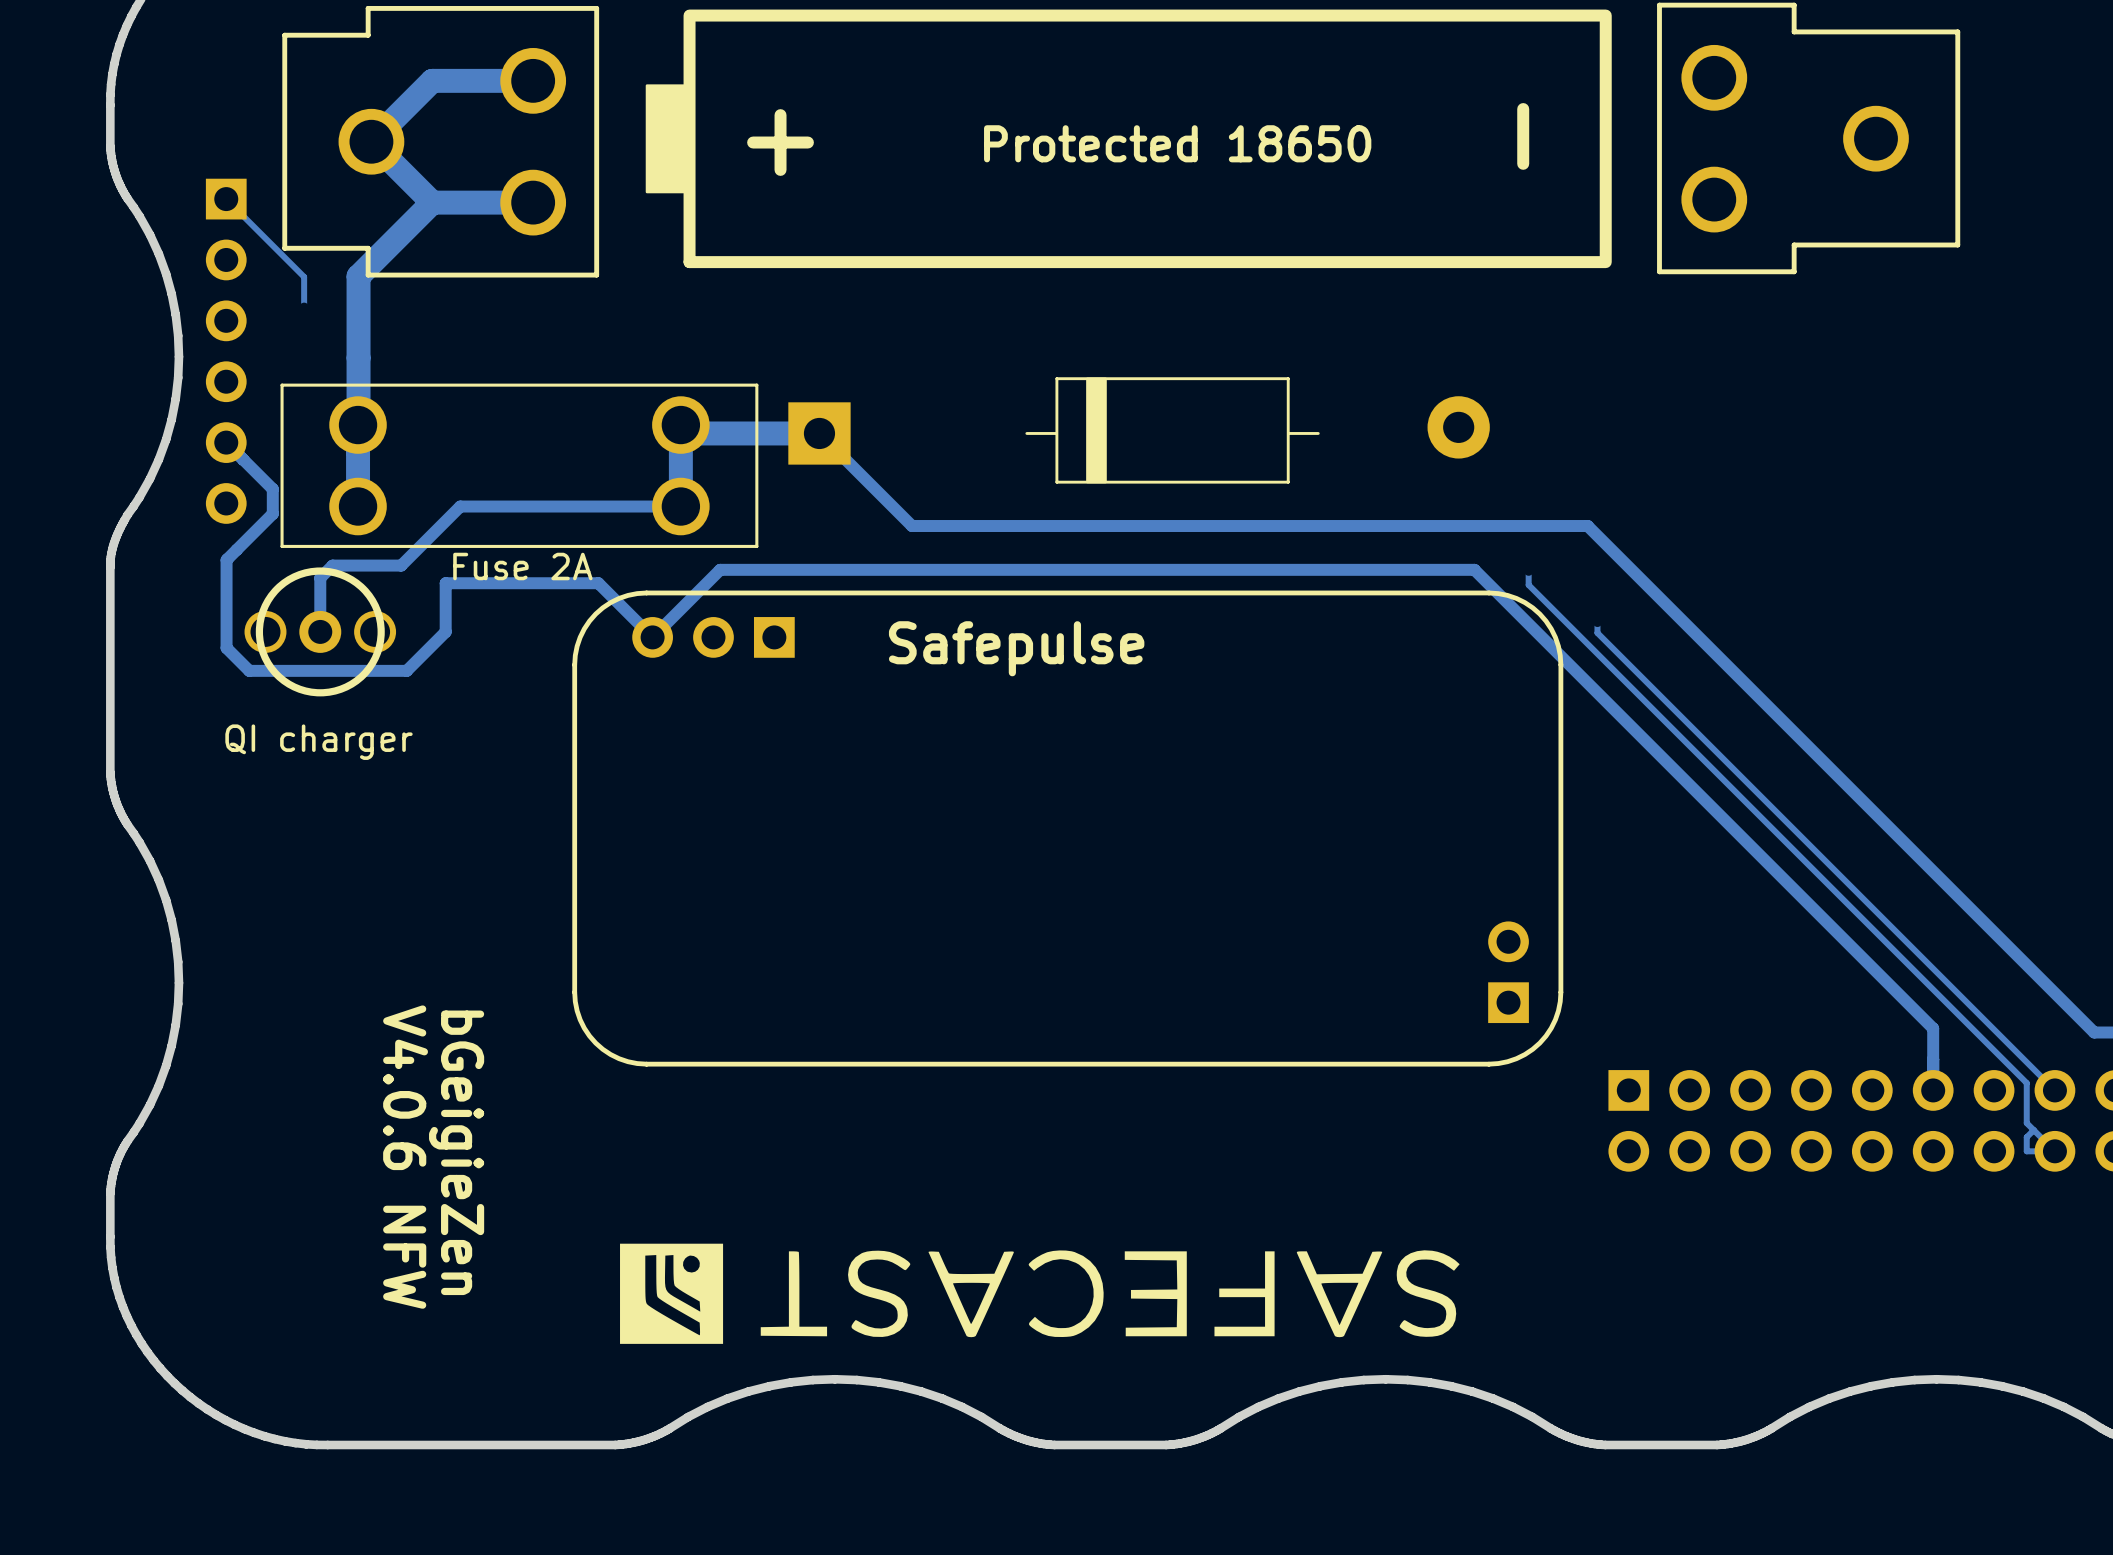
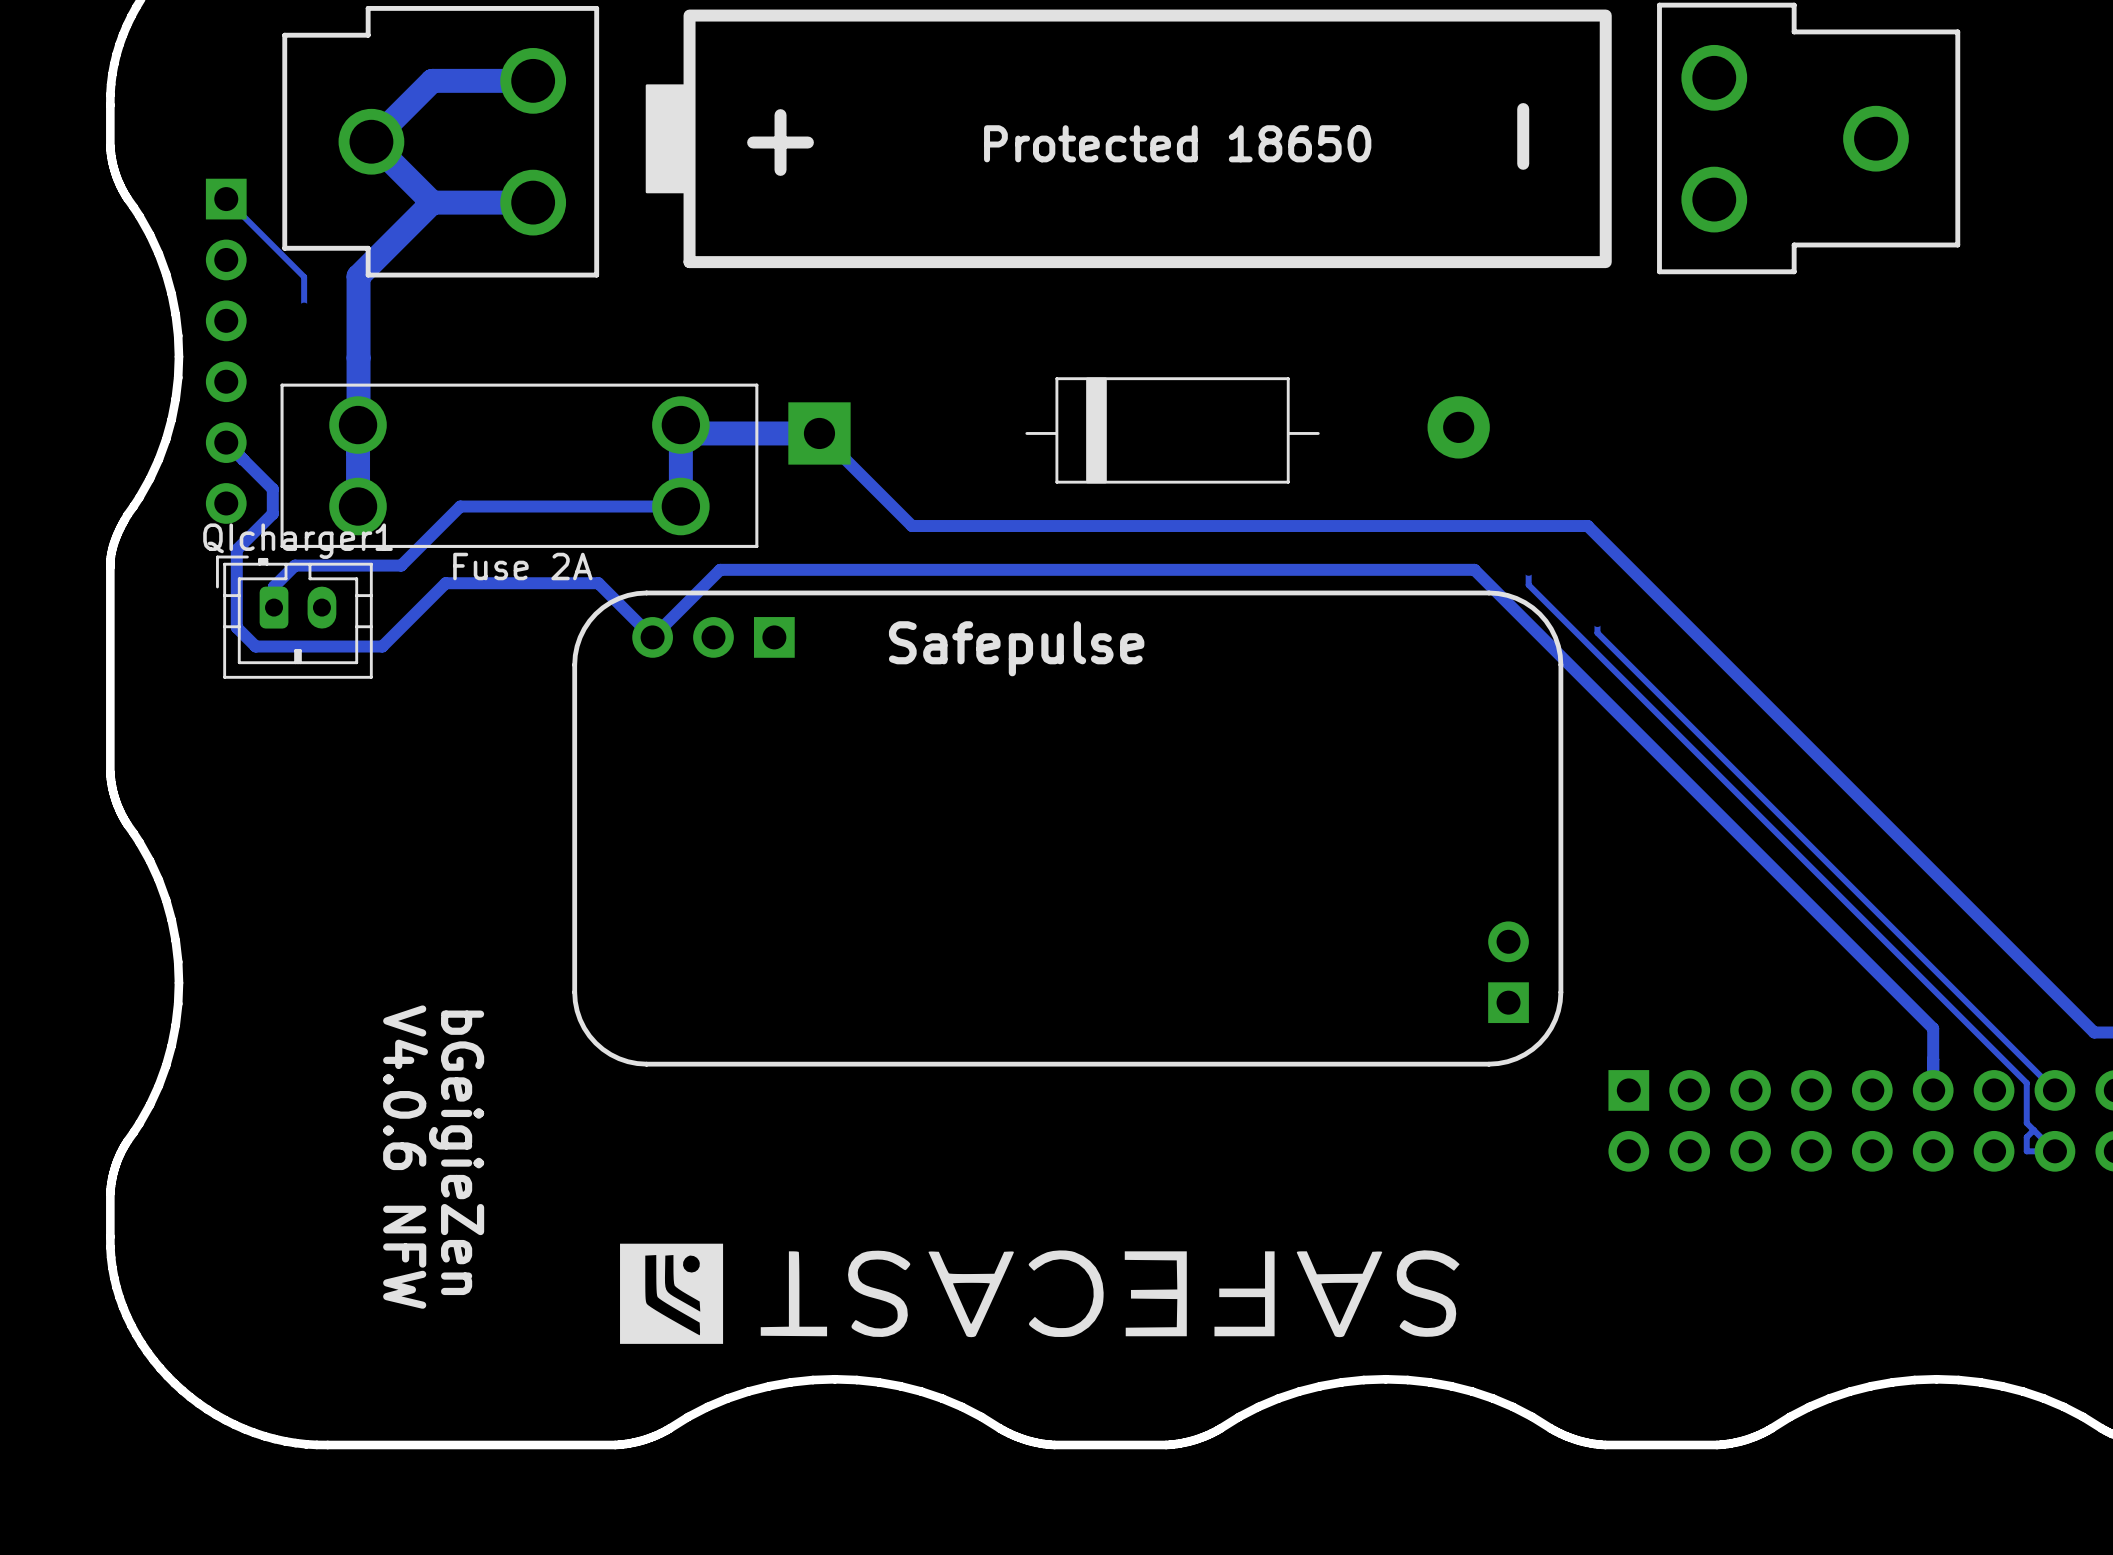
track: (236, 549) (226, 560) (226, 648) (249, 670) (406, 670) (445, 631) (445, 583) -> (236, 549) (236, 627) (255, 646) (382, 646) (445, 583)
track: (332, 565) (320, 577) (320, 631) -> (332, 565) (295, 565) (274, 586) (274, 607)
QIcharger1: none -> (294, 617)
QI charger: (320, 631) -> none

